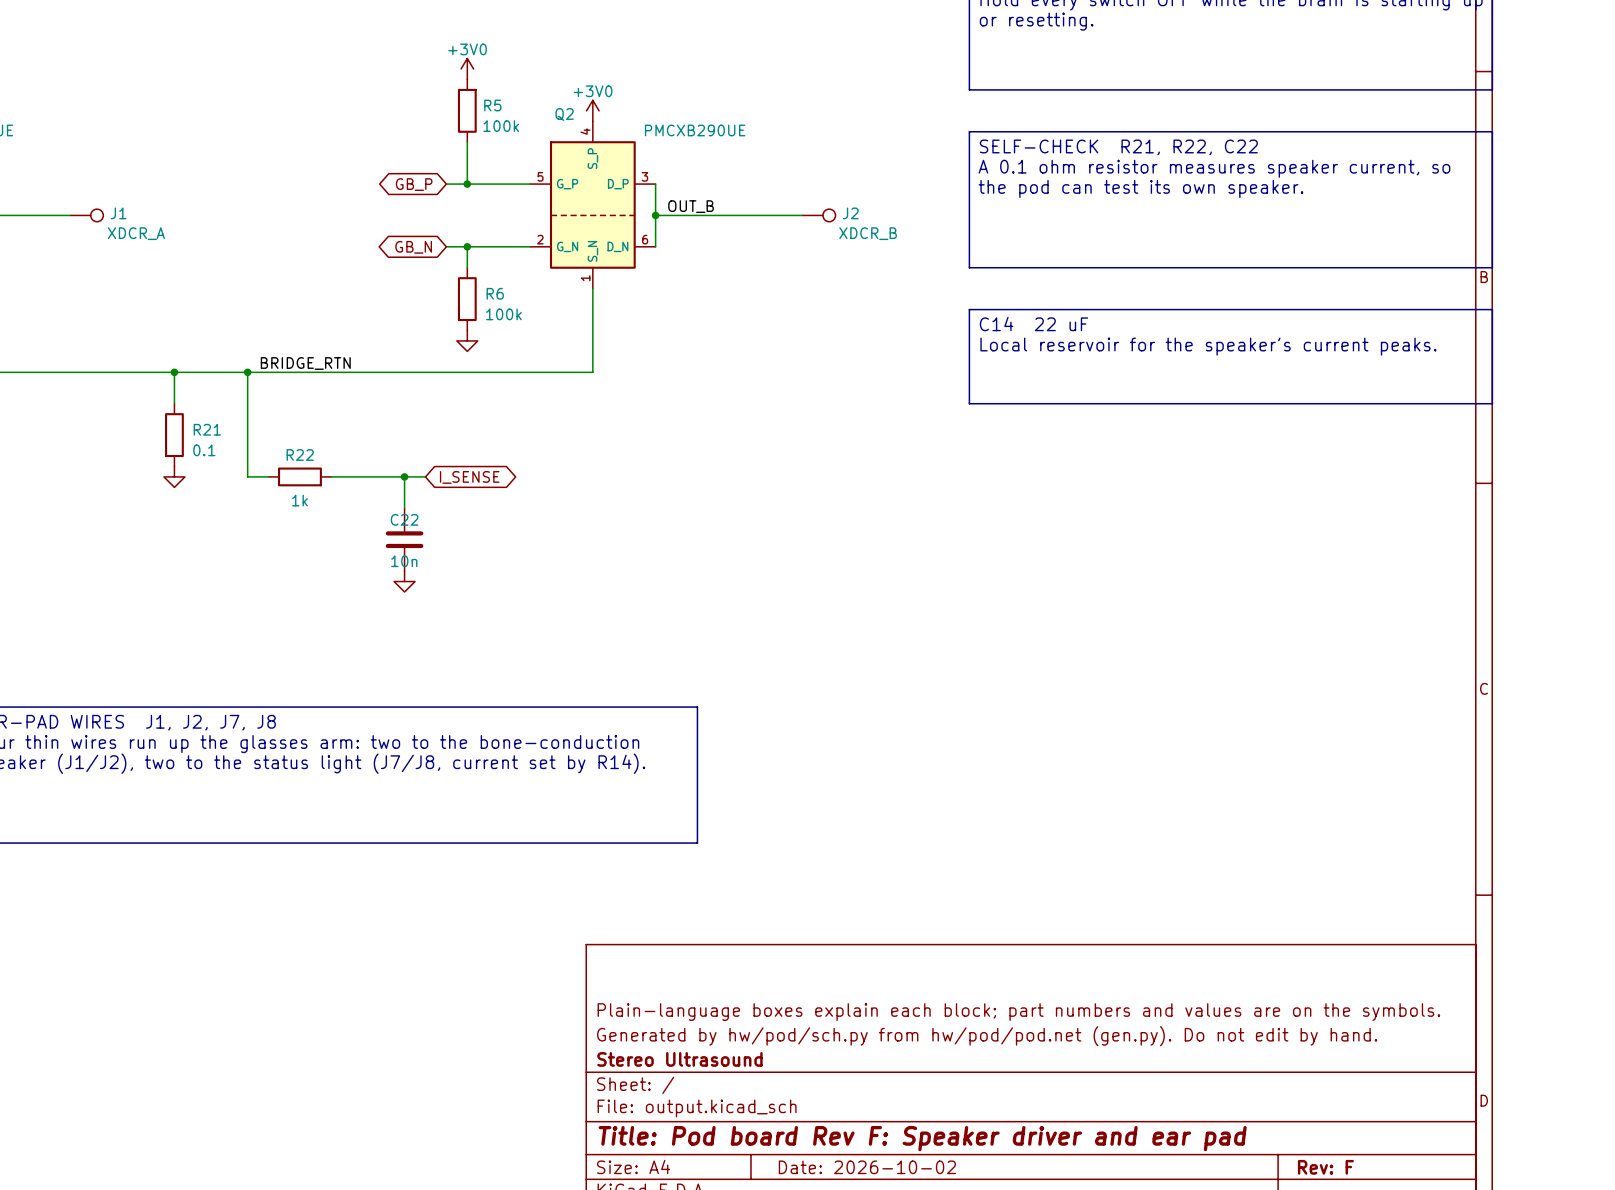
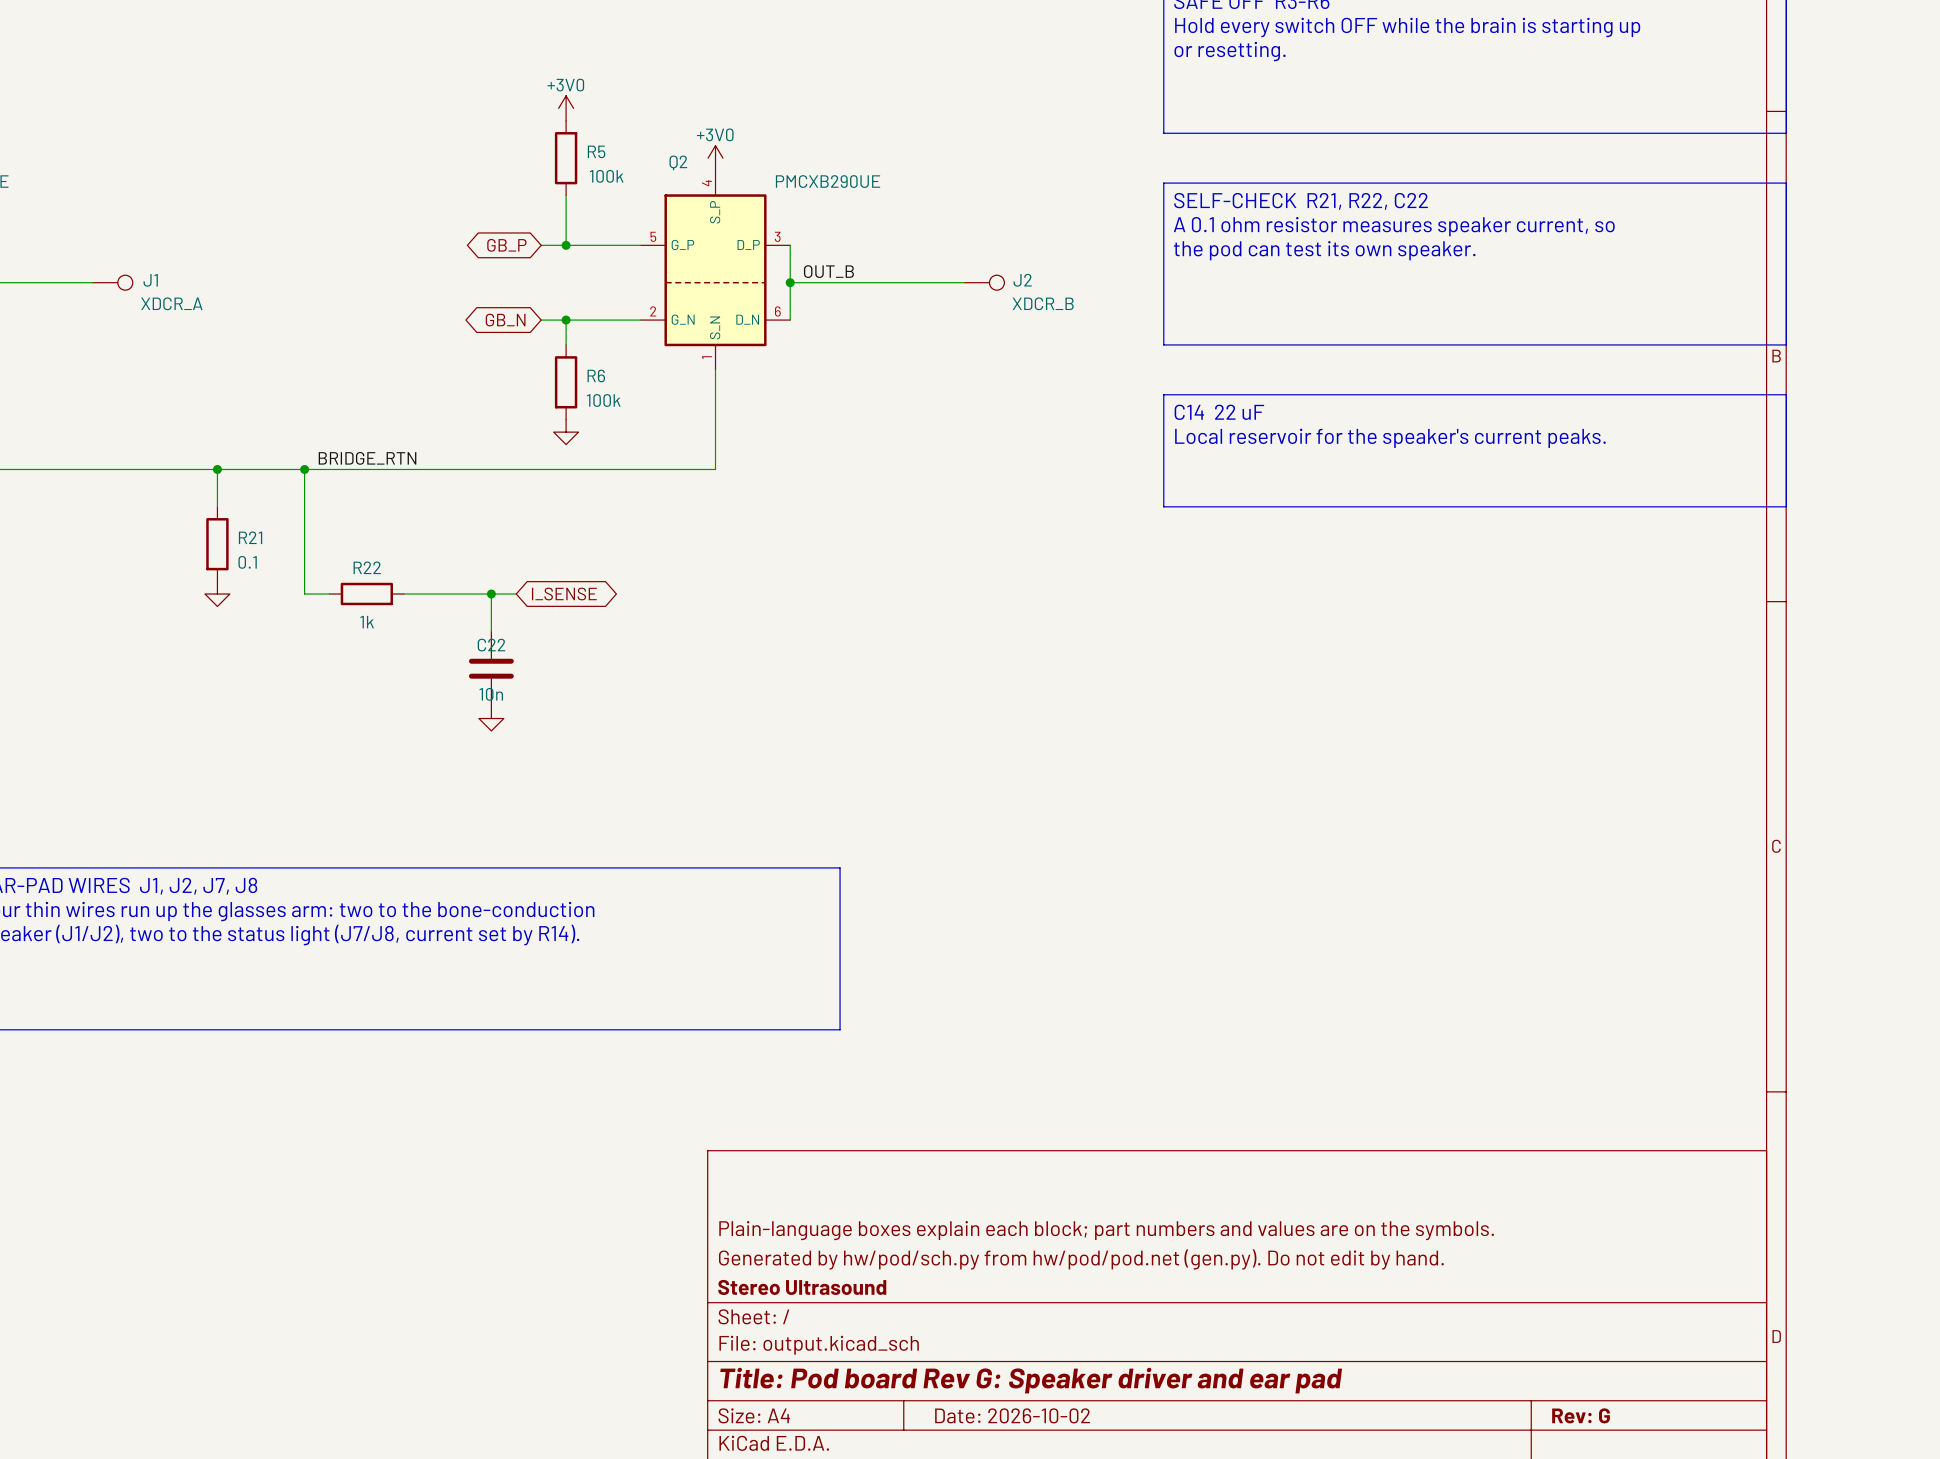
title block: Title: Pod board Rev F: Speaker driver and ear pad (922, 1138) -> Title: Pod board Rev G: Speaker driver and ear pad (1031, 1380)
title block: Rev: F (1325, 1167) -> Rev: G (1581, 1415)

